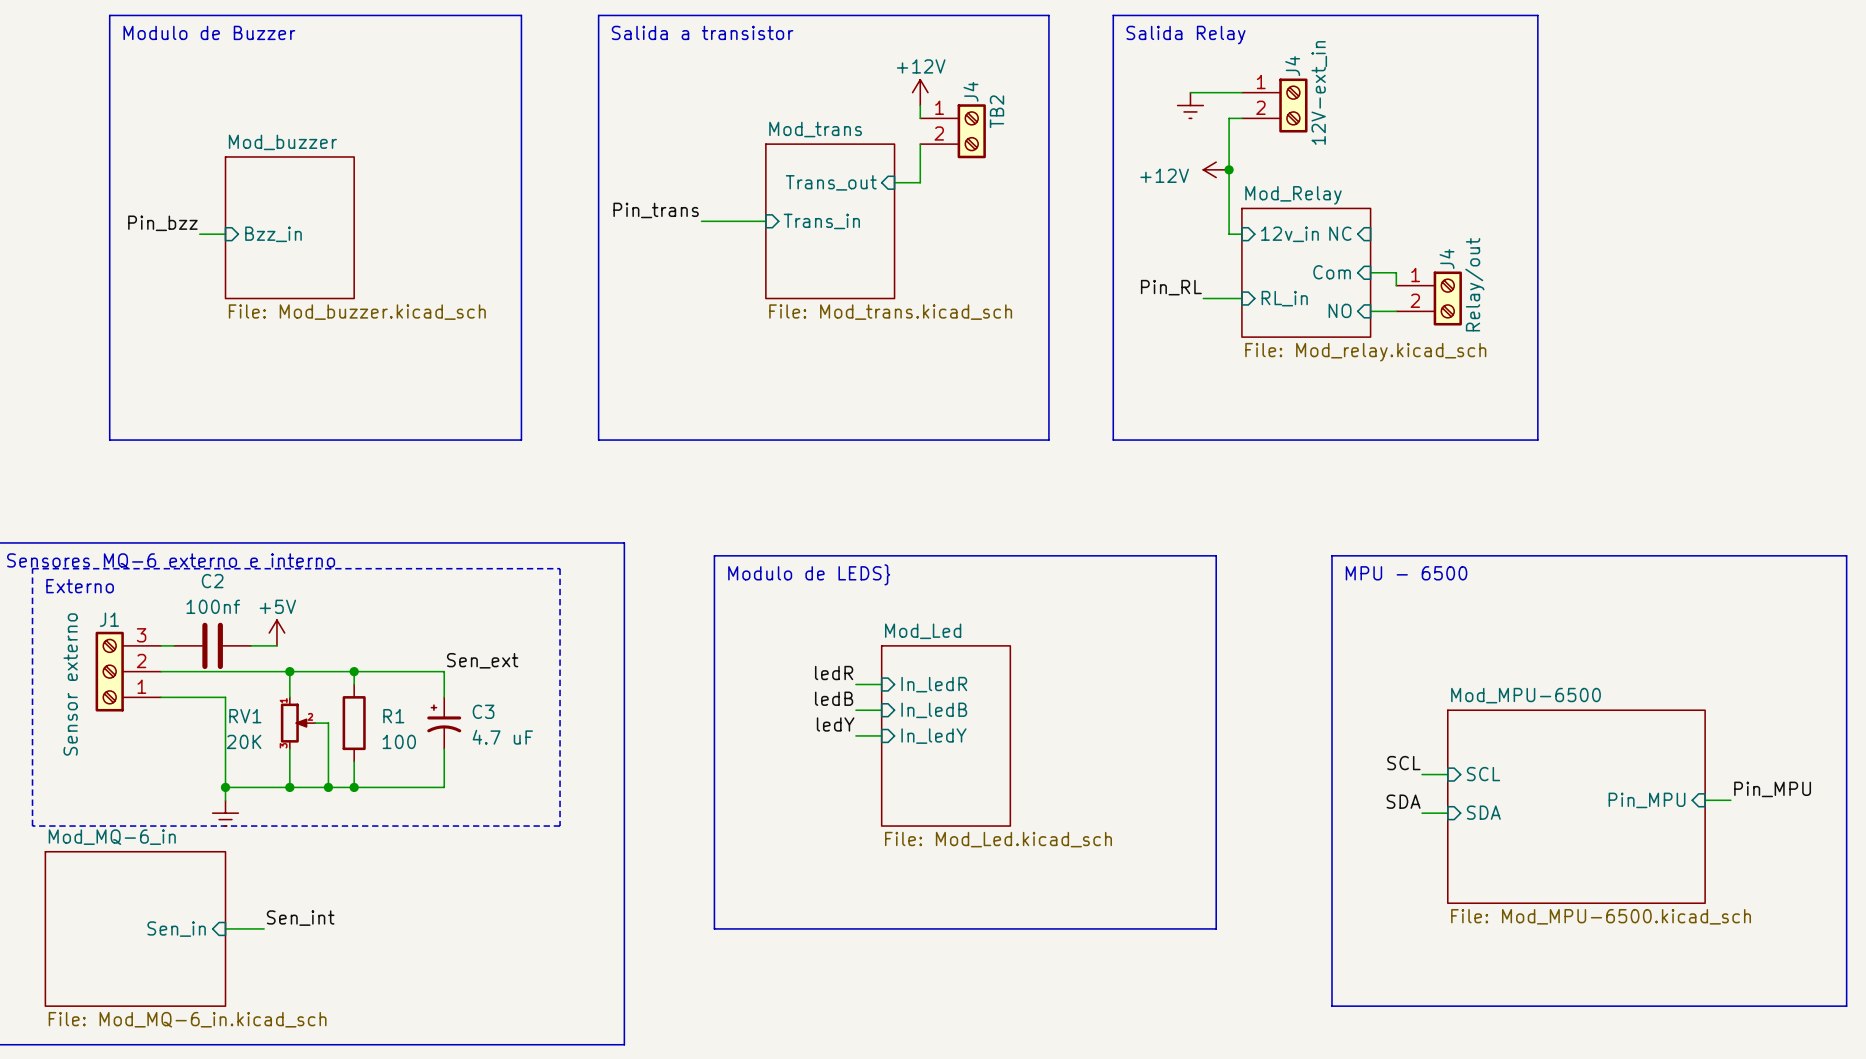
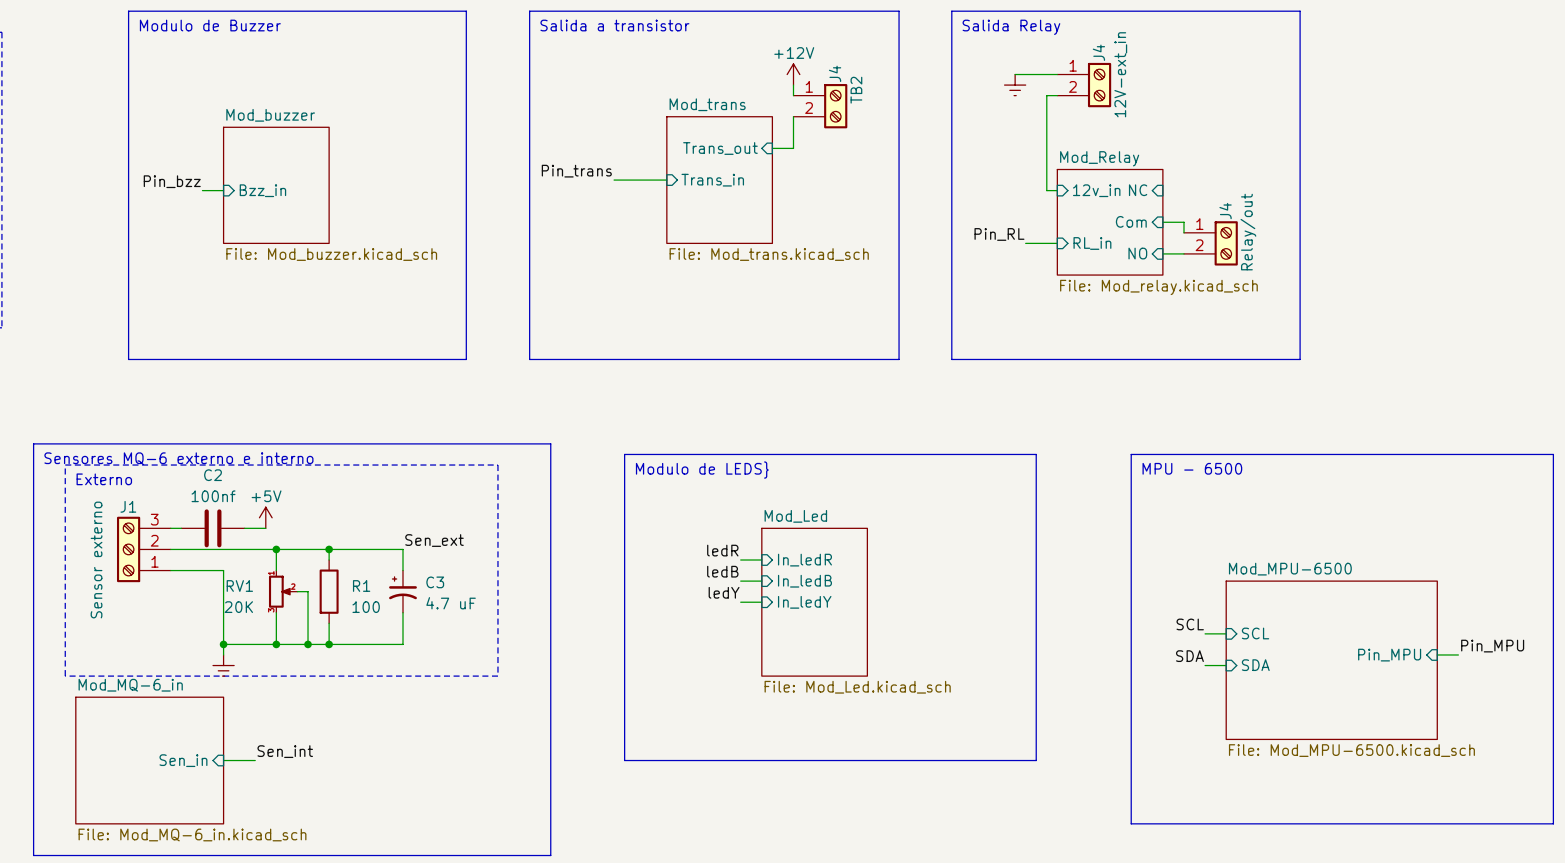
power symbol: +12V (1216, 169) -> none
junction: (1229, 169) -> none

